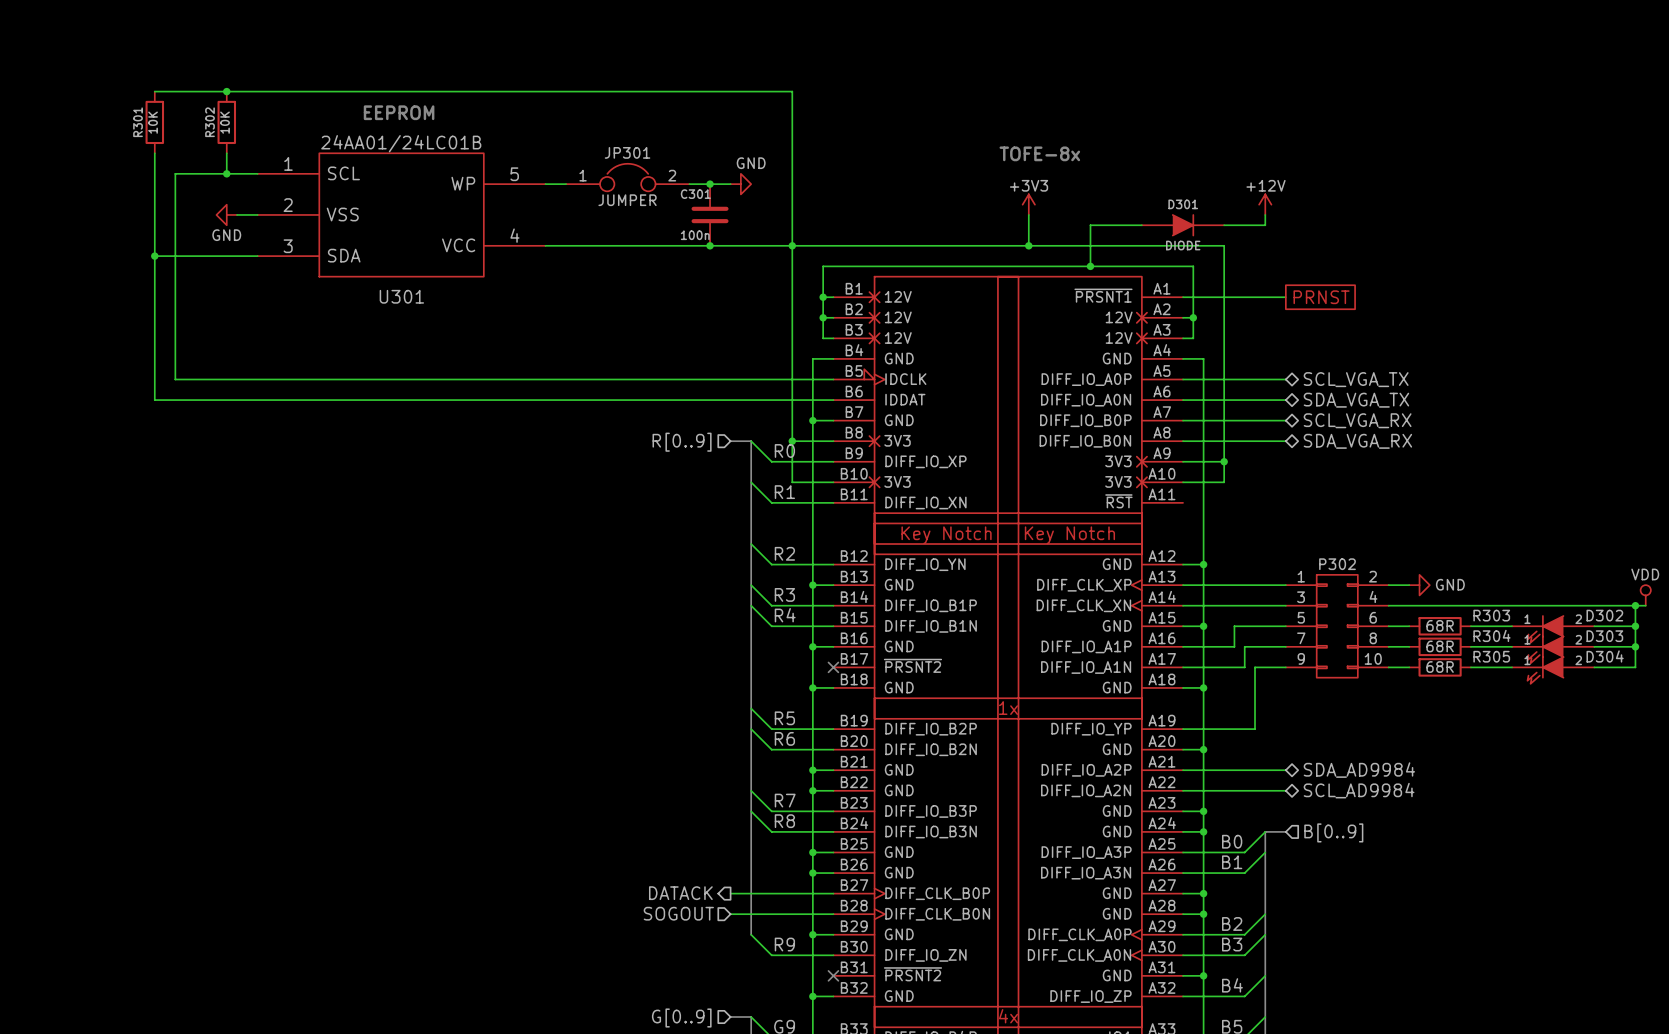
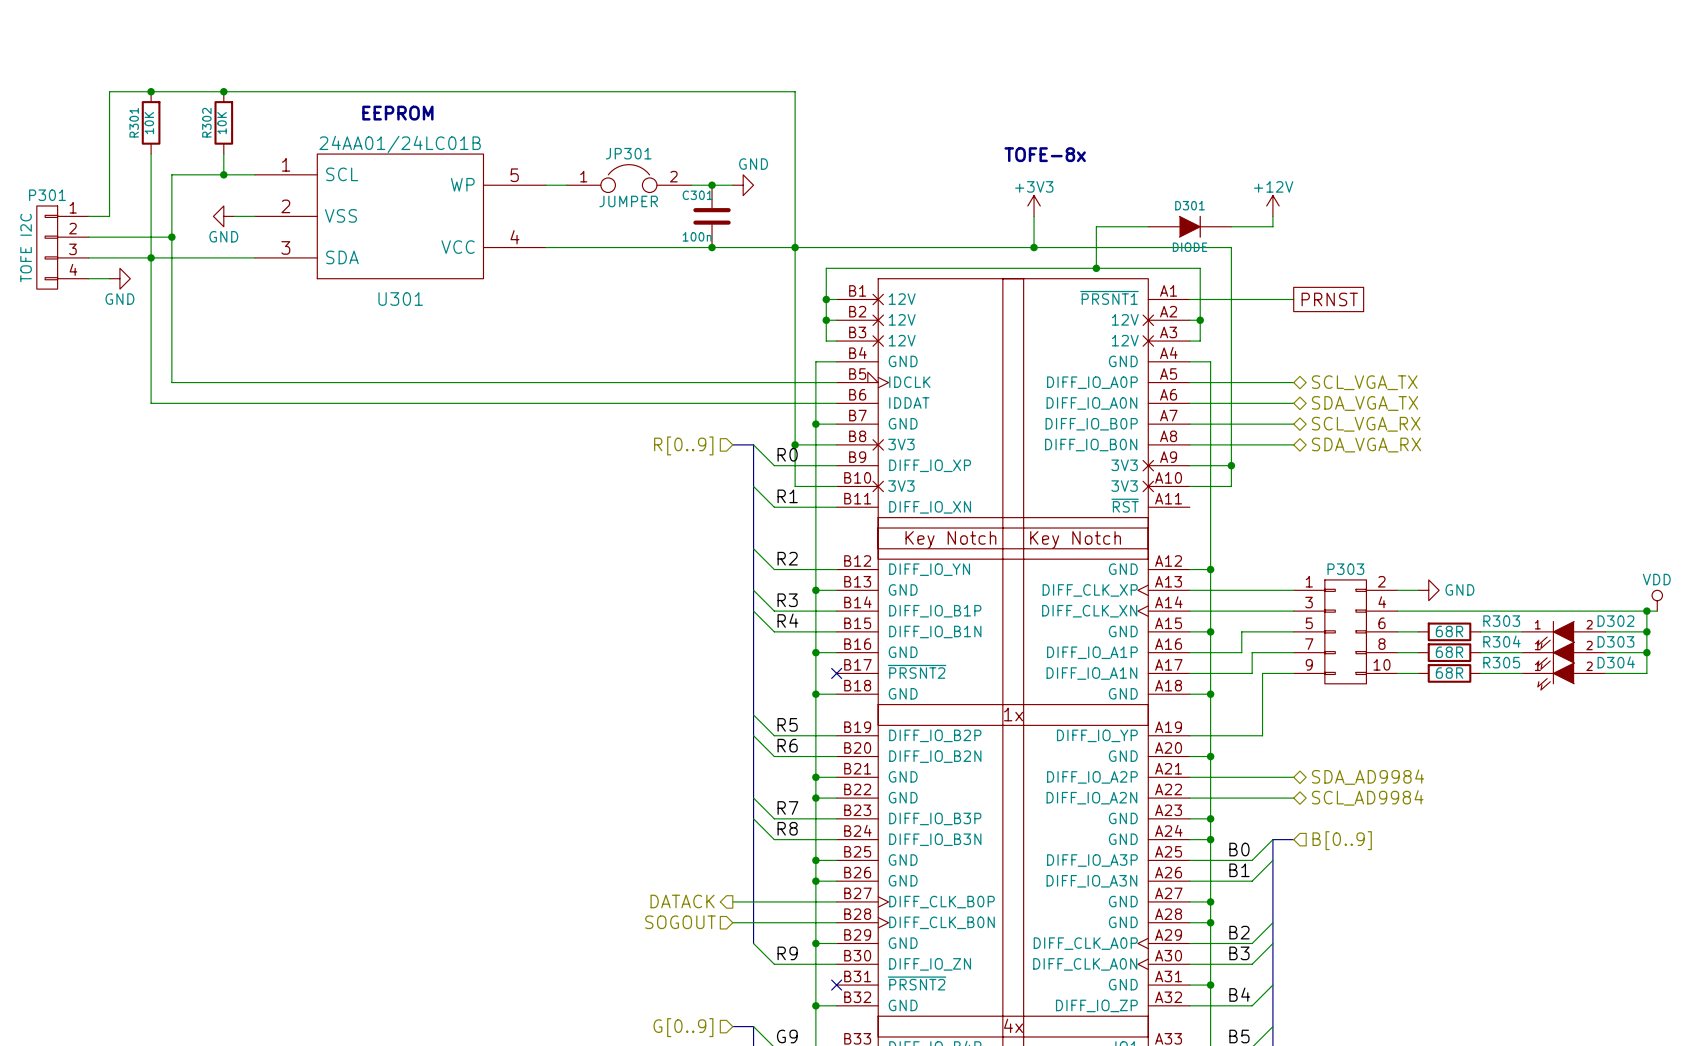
wire: none -> (151, 91) (109, 91) (109, 216) (88, 216)
junction: none -> (151, 91)
wire: none -> (88, 237) (171, 237)
junction: none -> (171, 237)
P301: none -> TOFE I2C (62, 247)
wire: none -> (88, 257) (151, 257)
wire: none -> (88, 278) (109, 278)
power symbol: none -> GND (119, 278)
P302 name: P302 (1337, 564) -> P303 (1345, 569)

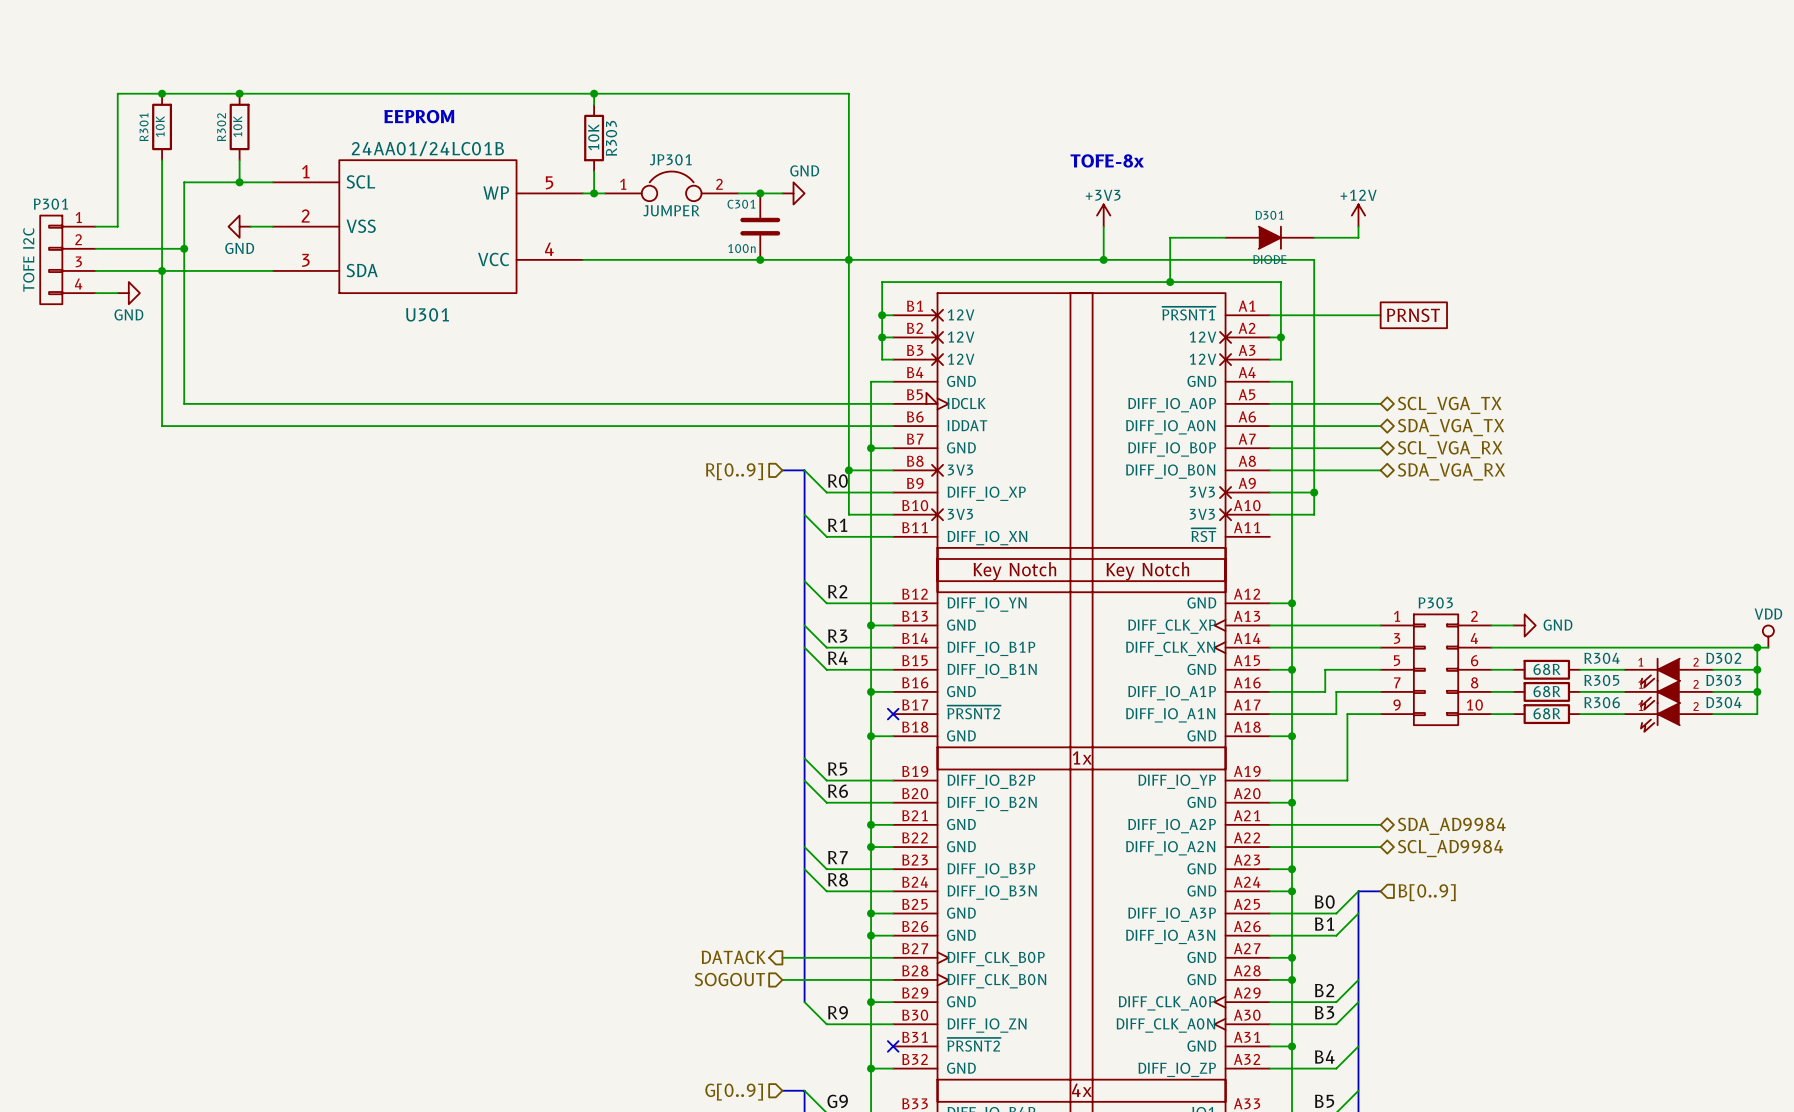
wire: none -> (594, 93) (594, 104)
junction: none -> (594, 93)
R303: none -> 10K (594, 138)
wire: none -> (594, 171) (594, 193)
junction: none -> (594, 193)
R303 name: R303 (1501, 621) -> R304 (1602, 658)
R304 name: R304 (1501, 641) -> R305 (1601, 680)
R305 name: R305 (1501, 662) -> R306 (1602, 702)

